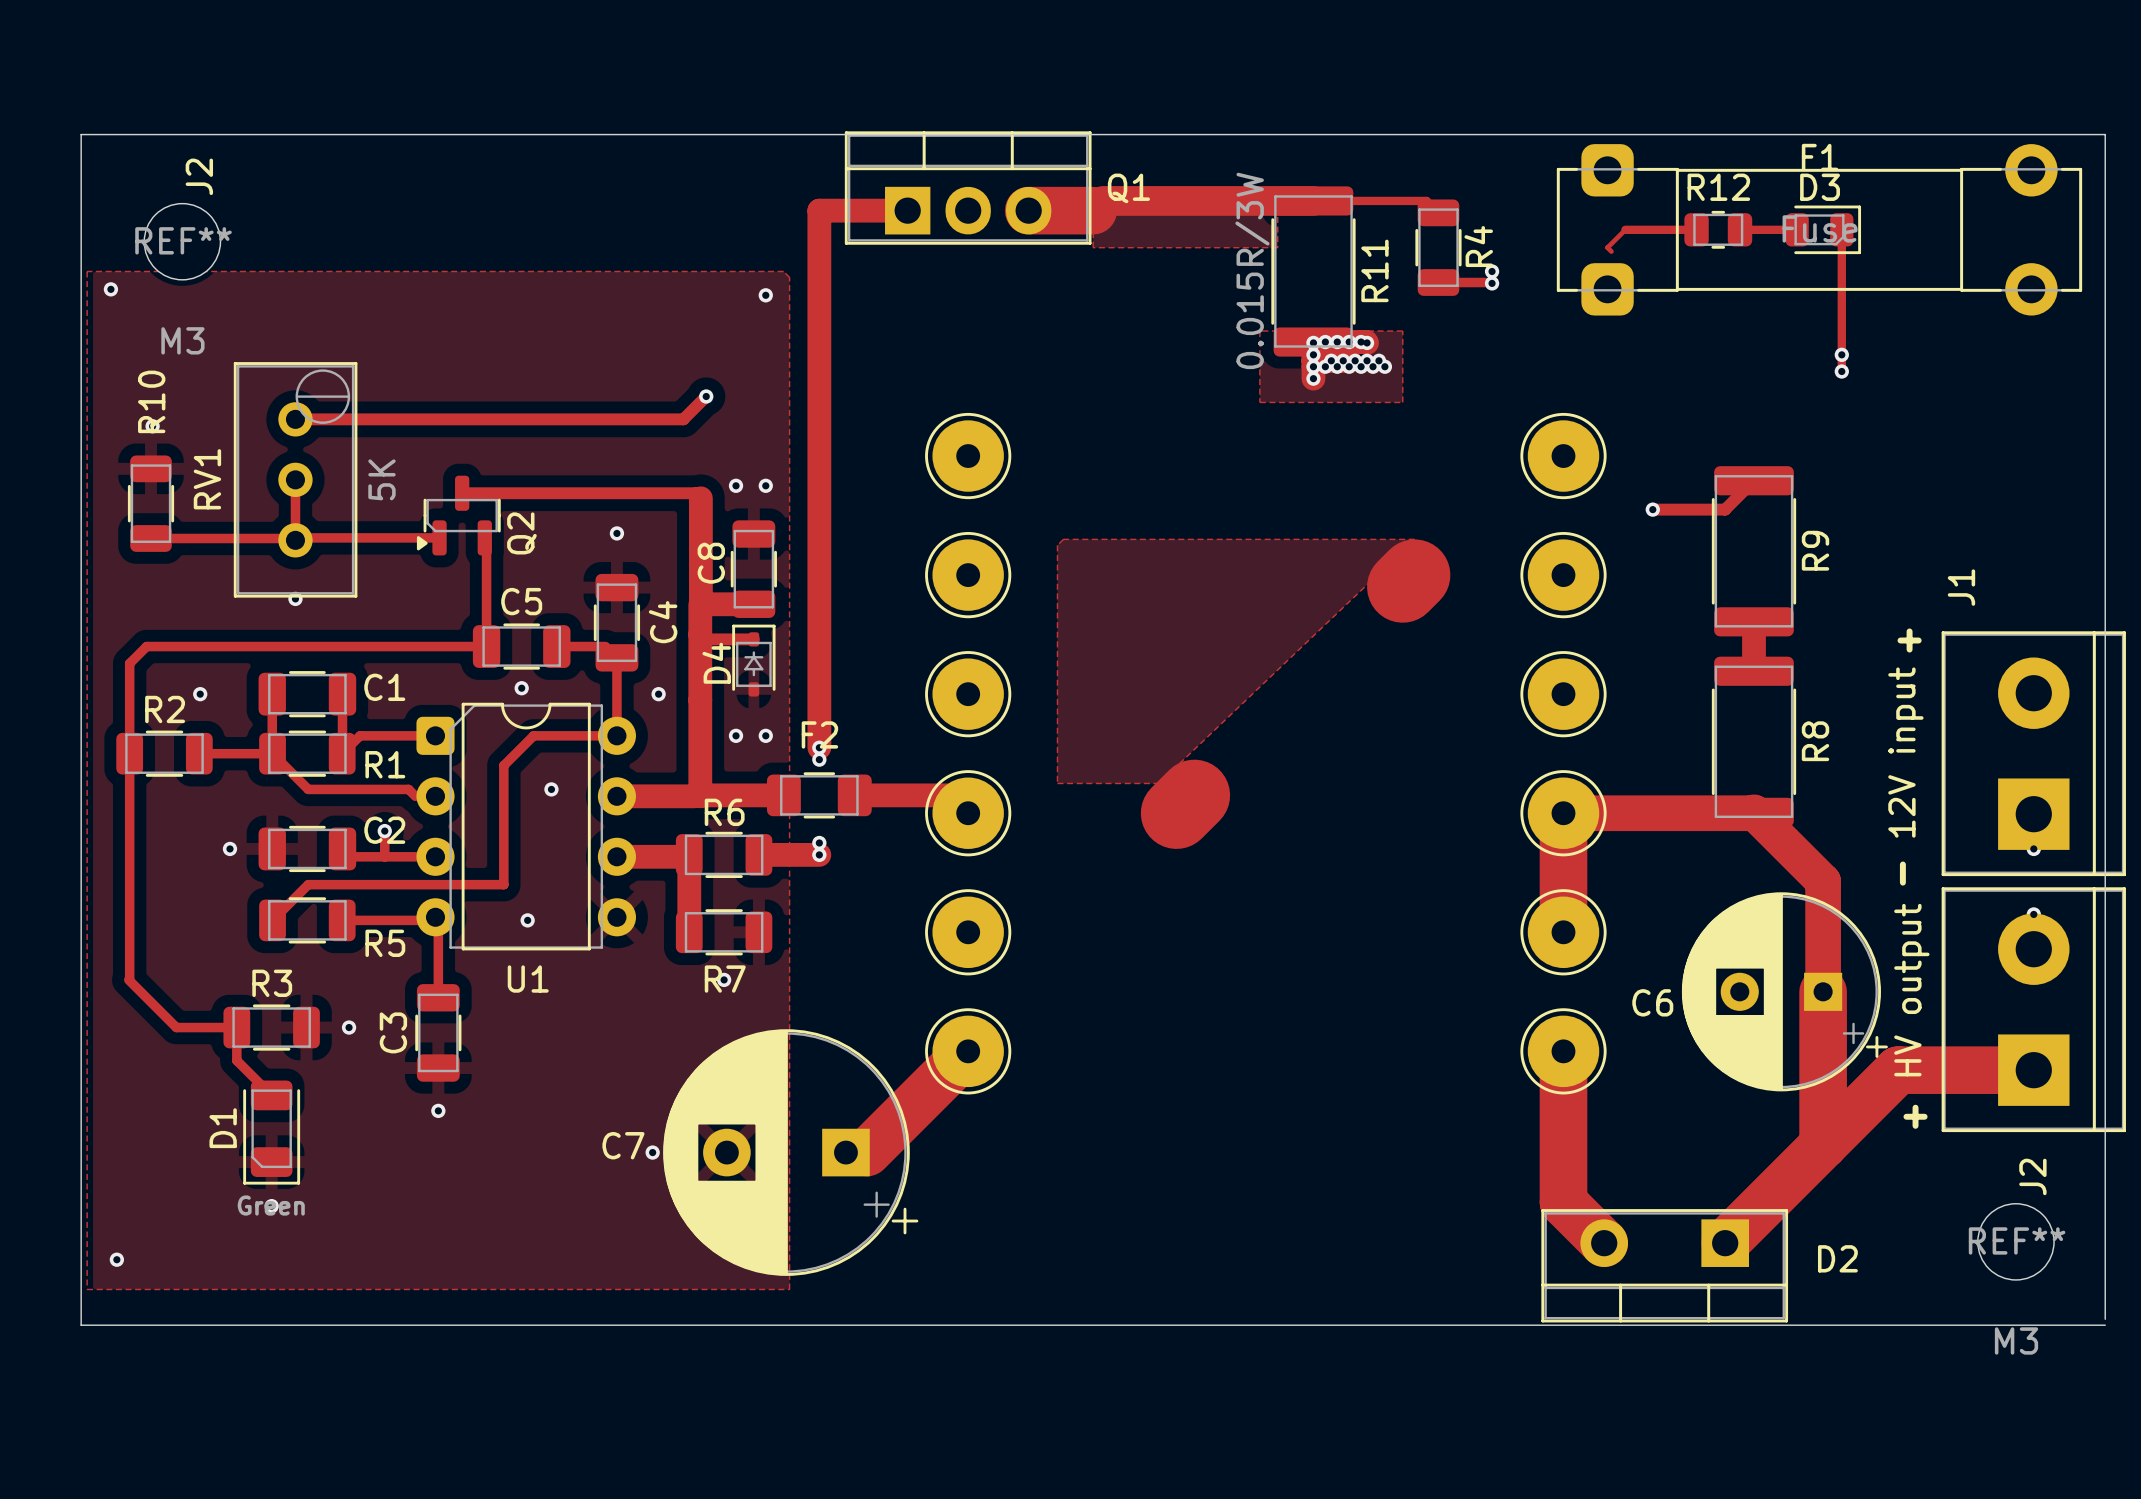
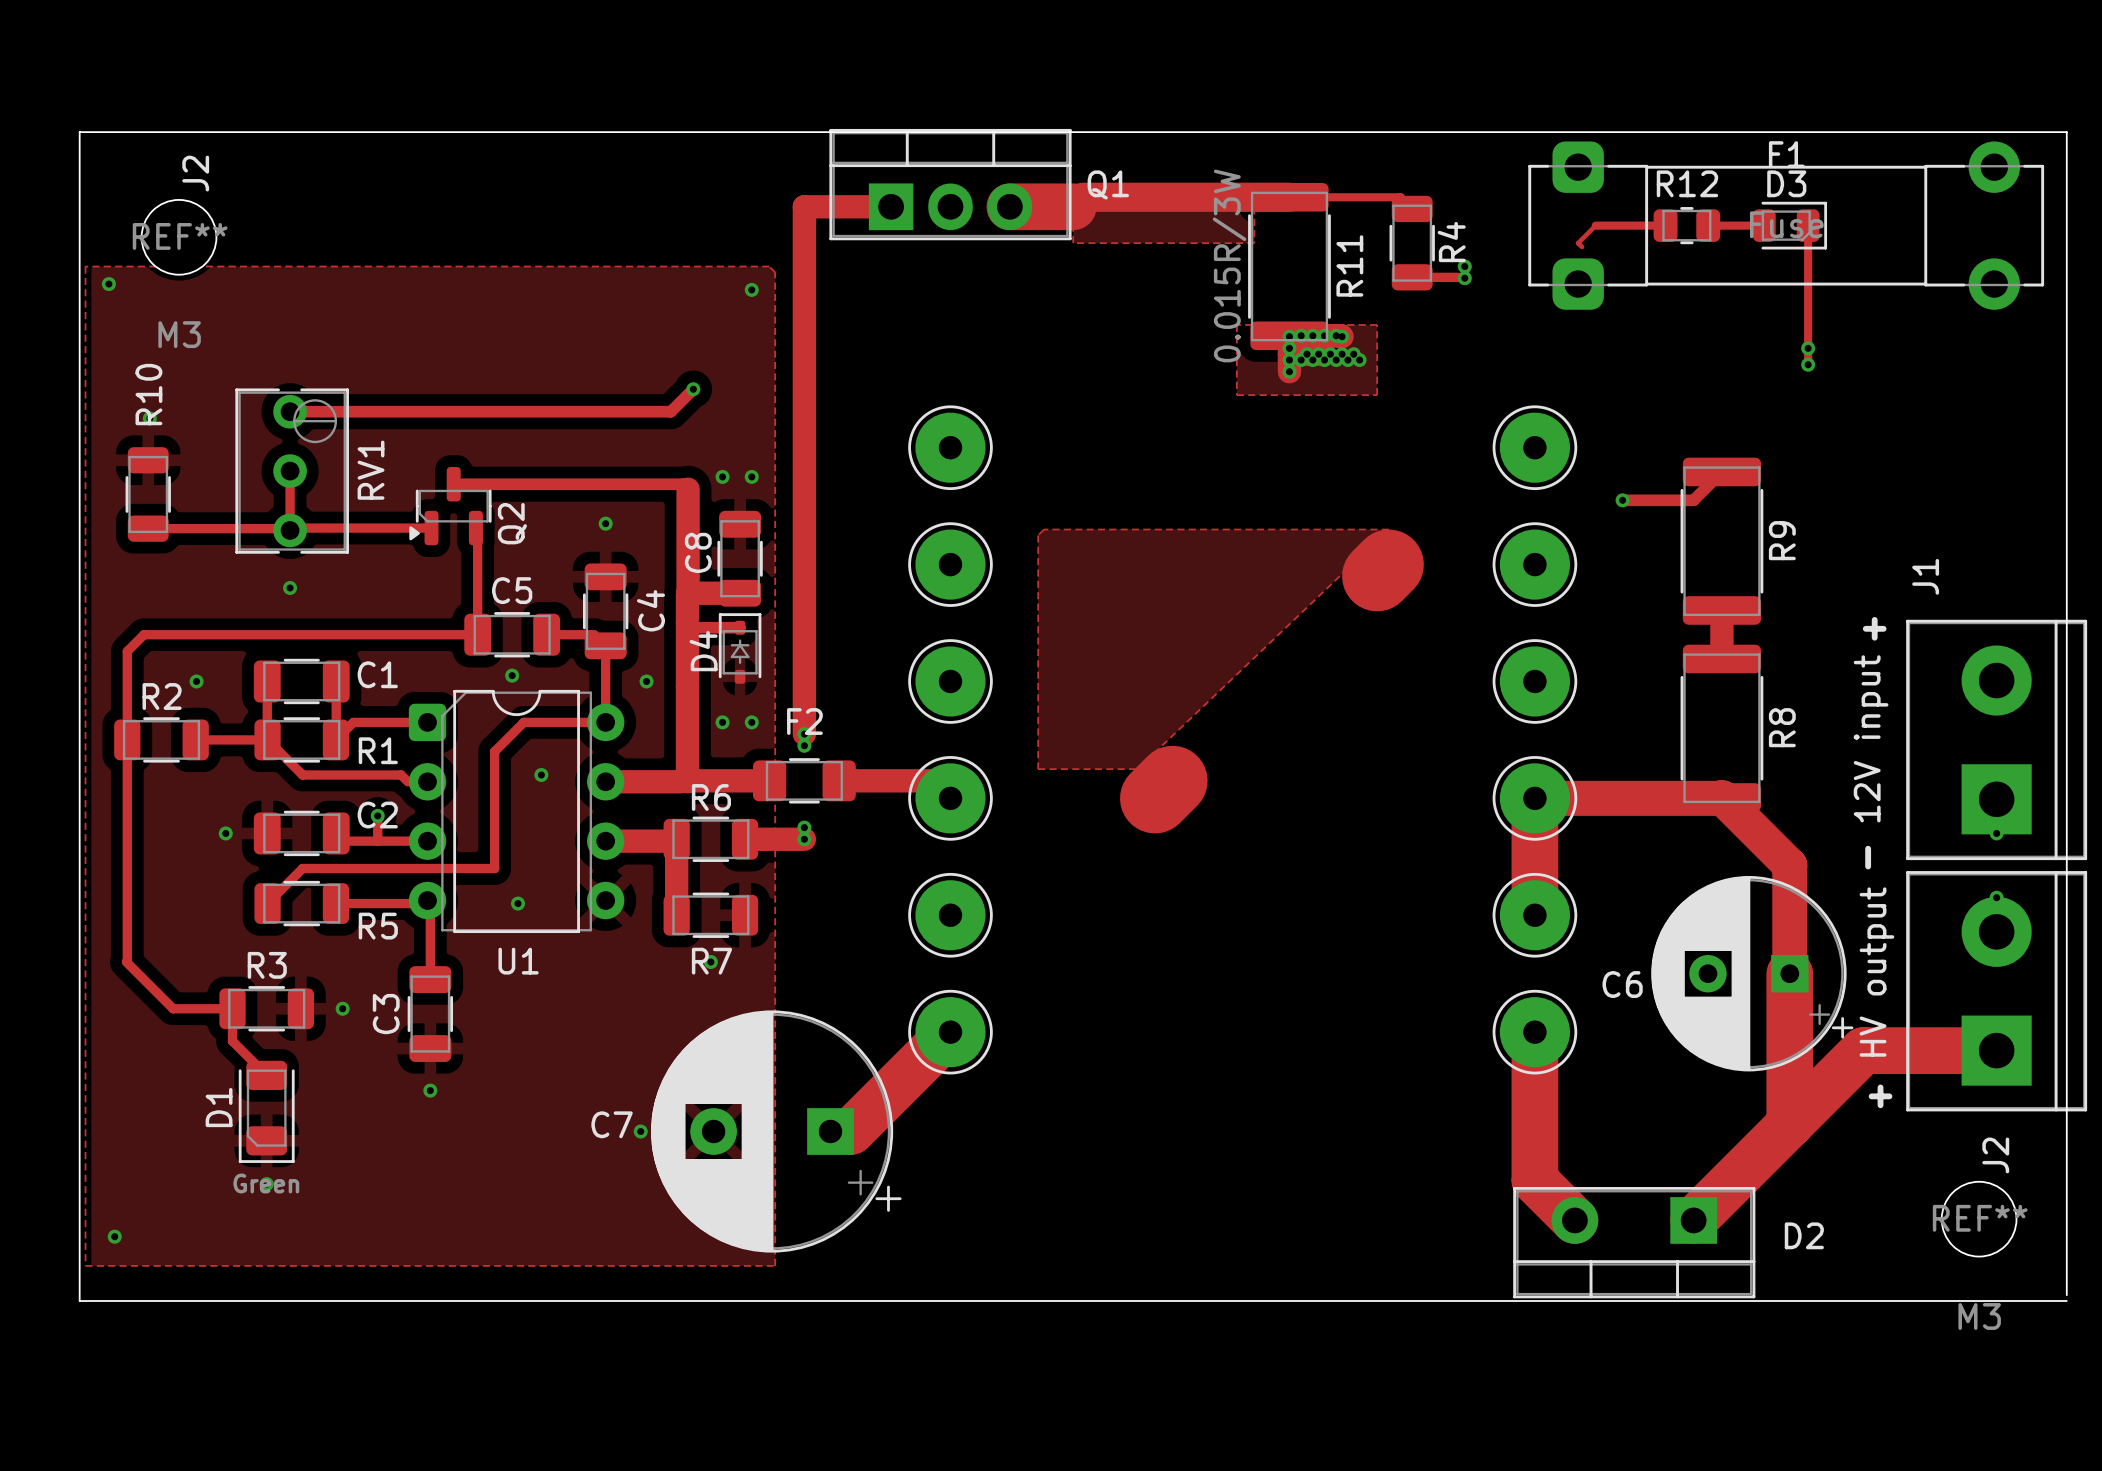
RV1 footprint: [233, 362, 358, 598] -> [235, 388, 349, 554]
RV1 name position: RV1 (207, 479) -> RV1 (371, 470)
RV1 value: 5K (381, 479) -> none

